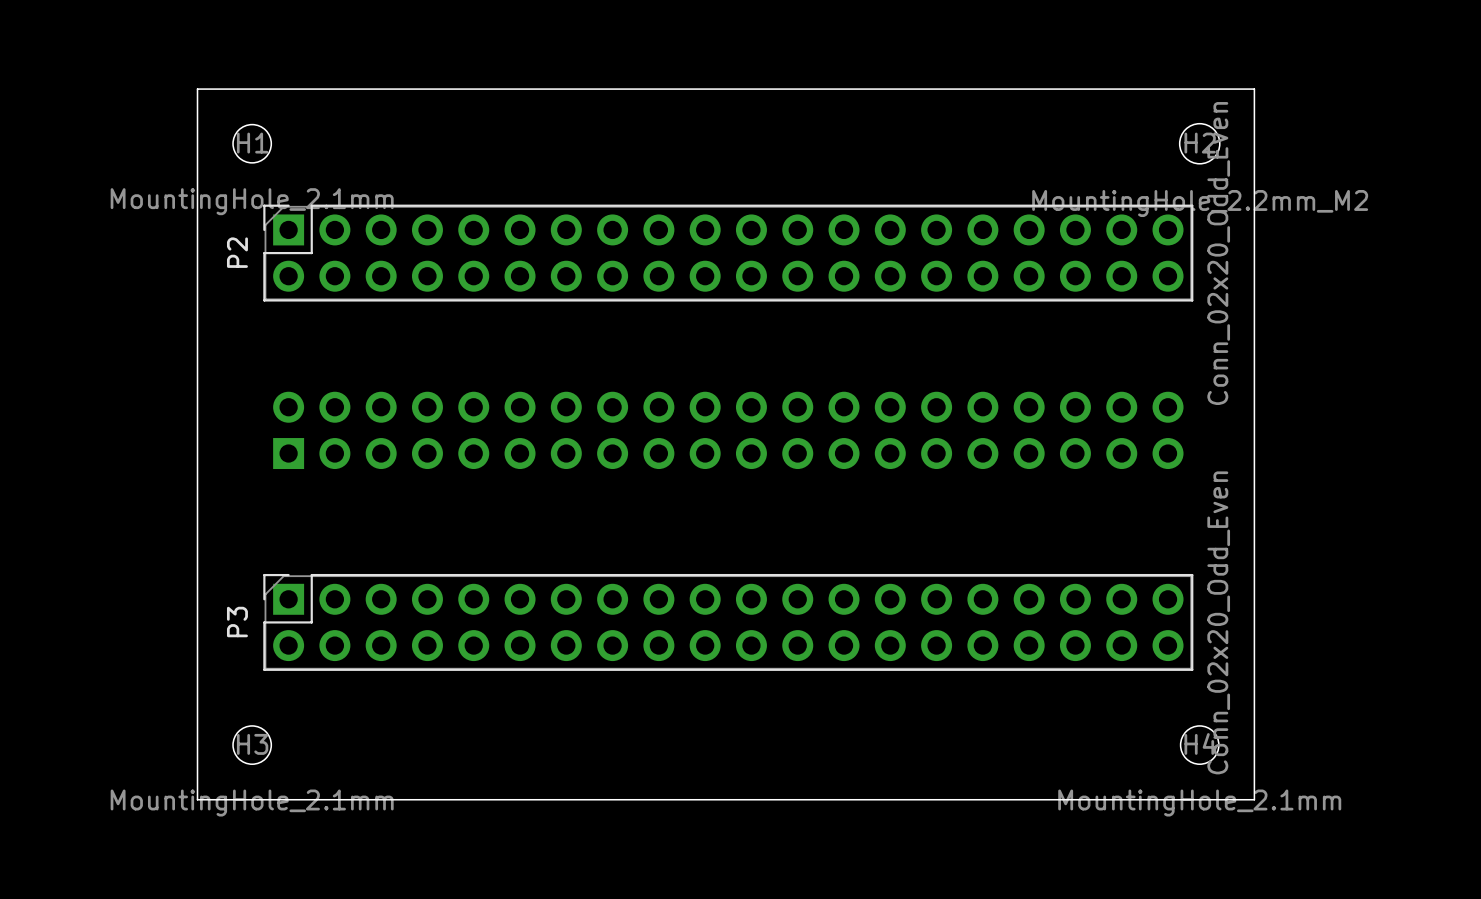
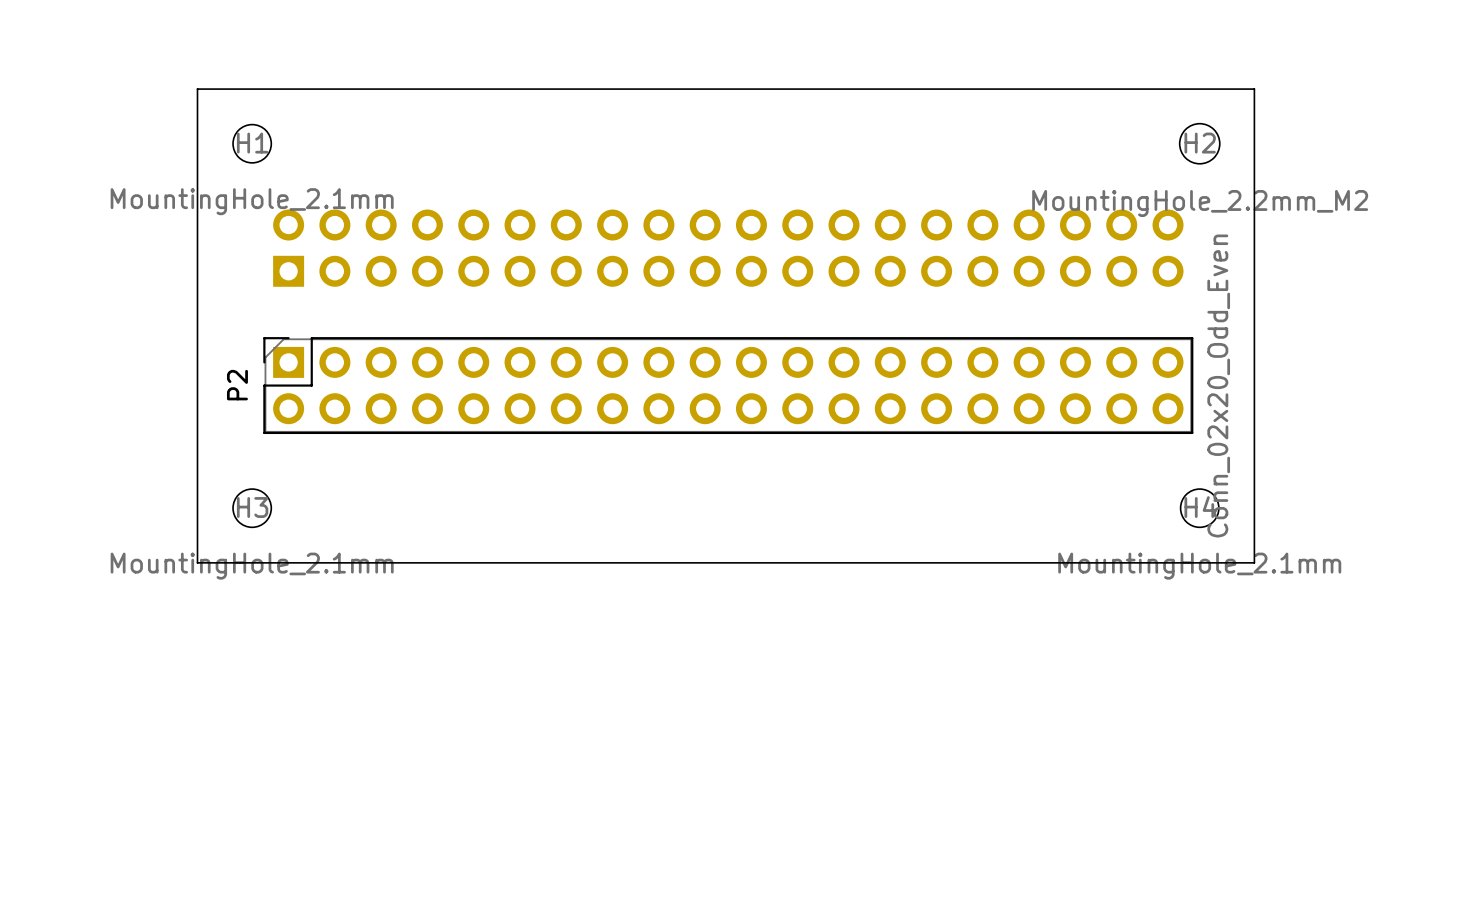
P2 position: (728, 253) -> (728, 385)
part position: (728, 430) -> (728, 248)
board edge: (197, 562) (197, 799) (1254, 799) (1254, 562) -> (197, 562) (1254, 562)
P3: Conn_02x20_Odd_Even (728, 622) -> none
H3 position: (252, 745) -> (252, 508)
H4 position: (1199, 745) -> (1199, 508)

